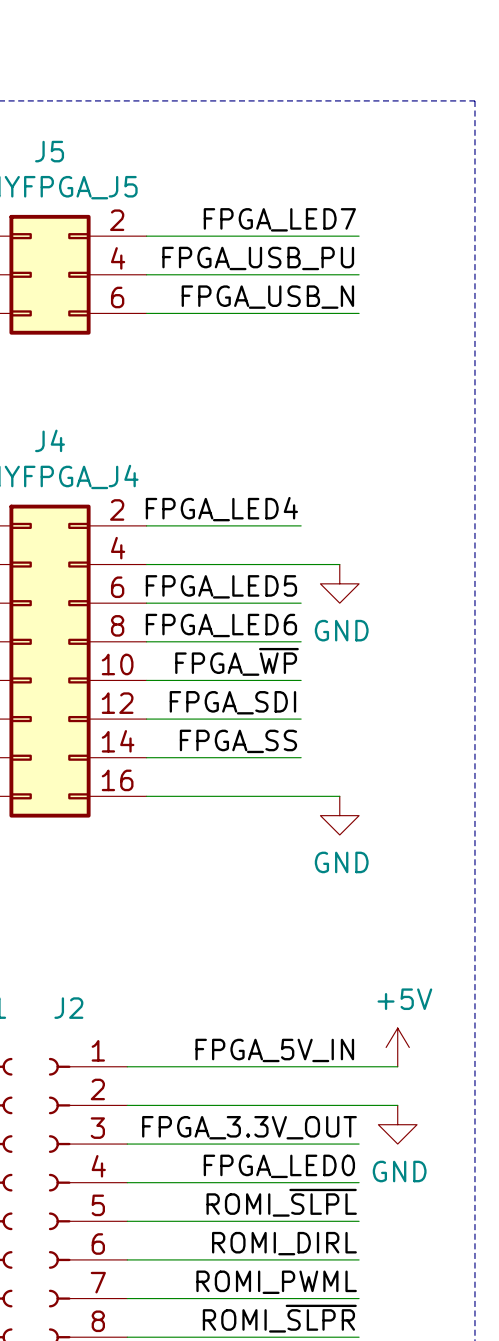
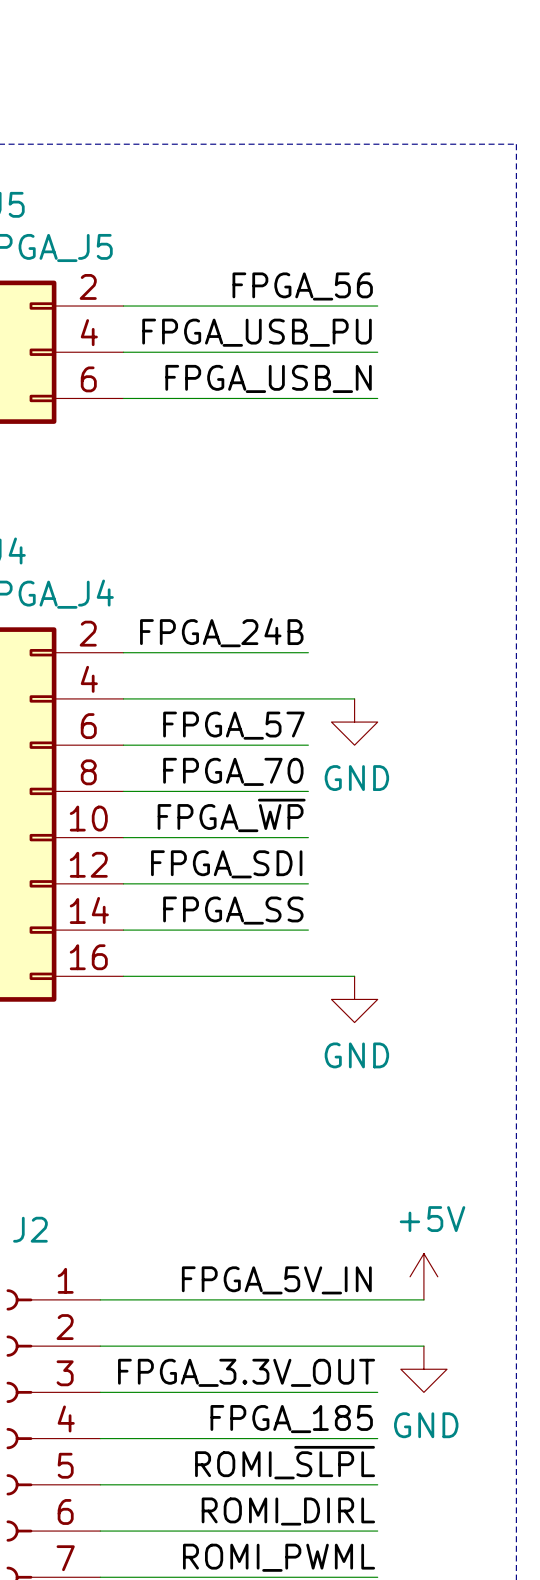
label: FPGA_LED7 (279, 219) -> FPGA_56 (302, 286)
label: FPGA_LED4 (221, 509) -> FPGA_24B (221, 632)
label: FPGA_LED5 (221, 586) -> FPGA_57 (233, 725)
label: FPGA_LED6 (221, 625) -> FPGA_70 (233, 771)
label: FPGA_LED0 (279, 1166) -> FPGA_185 (291, 1419)

